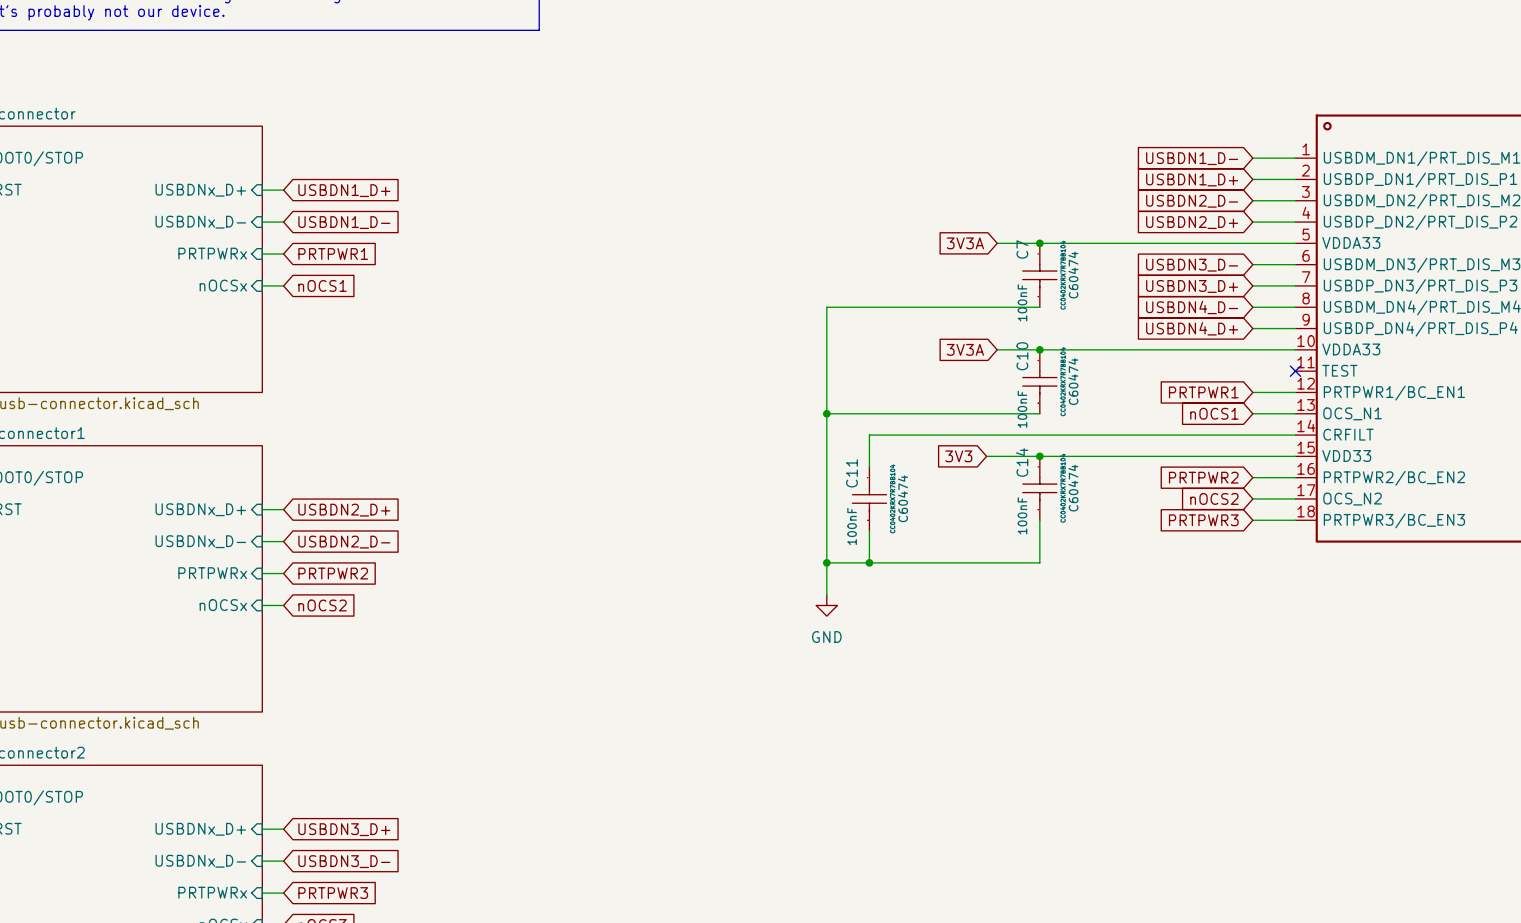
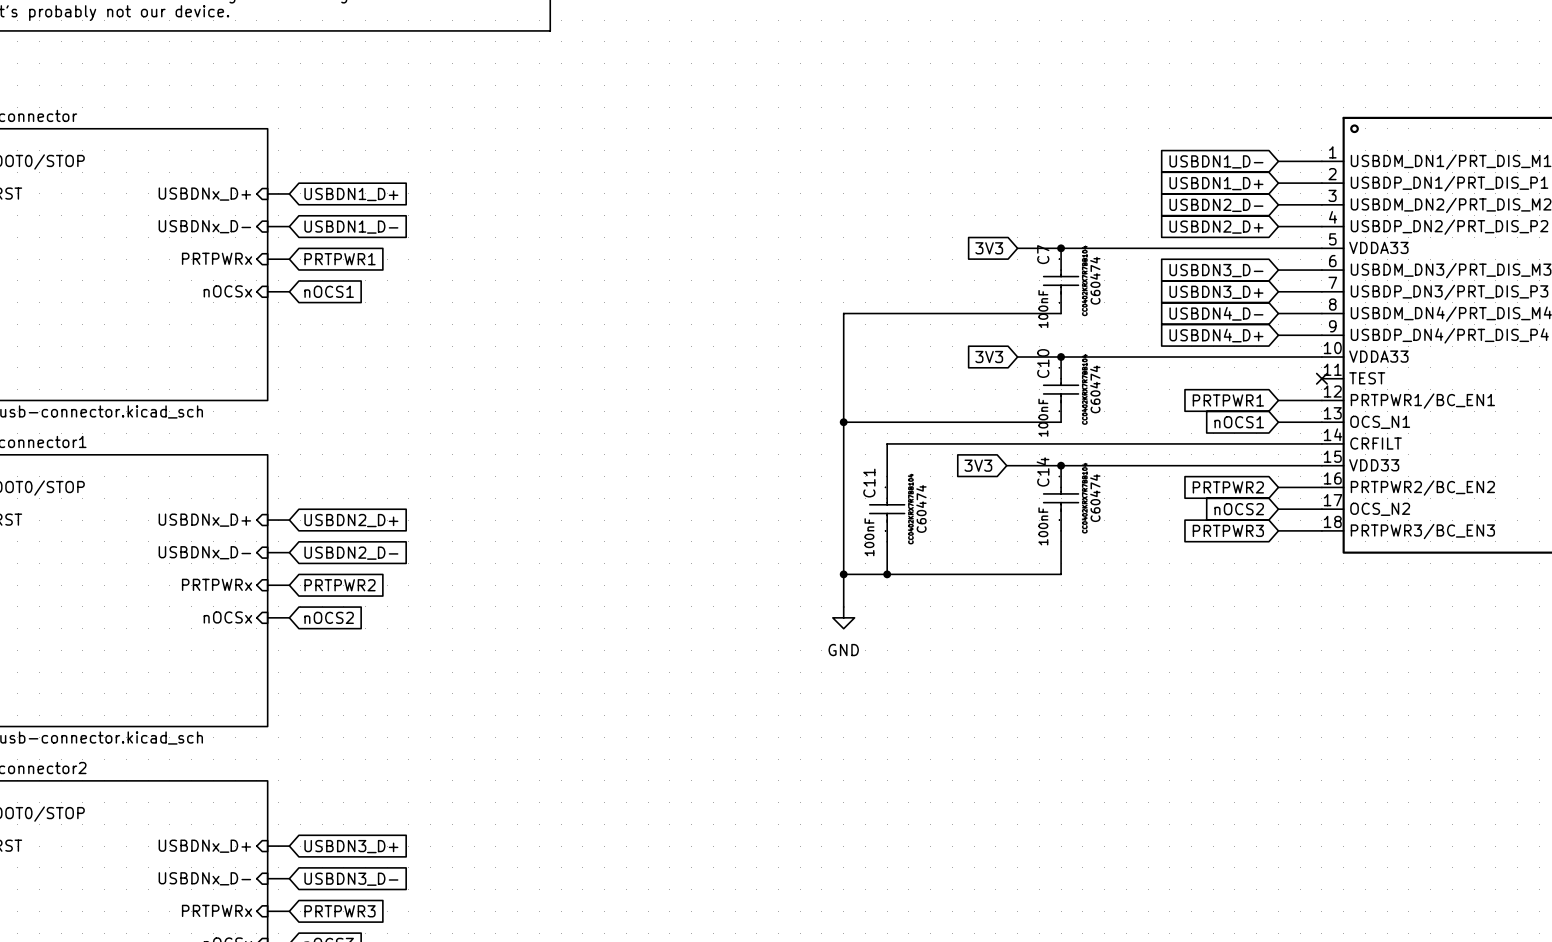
global label: 3V3A (965, 243) -> 3V3 (989, 248)
global label: 3V3A (965, 349) -> 3V3 (989, 357)

